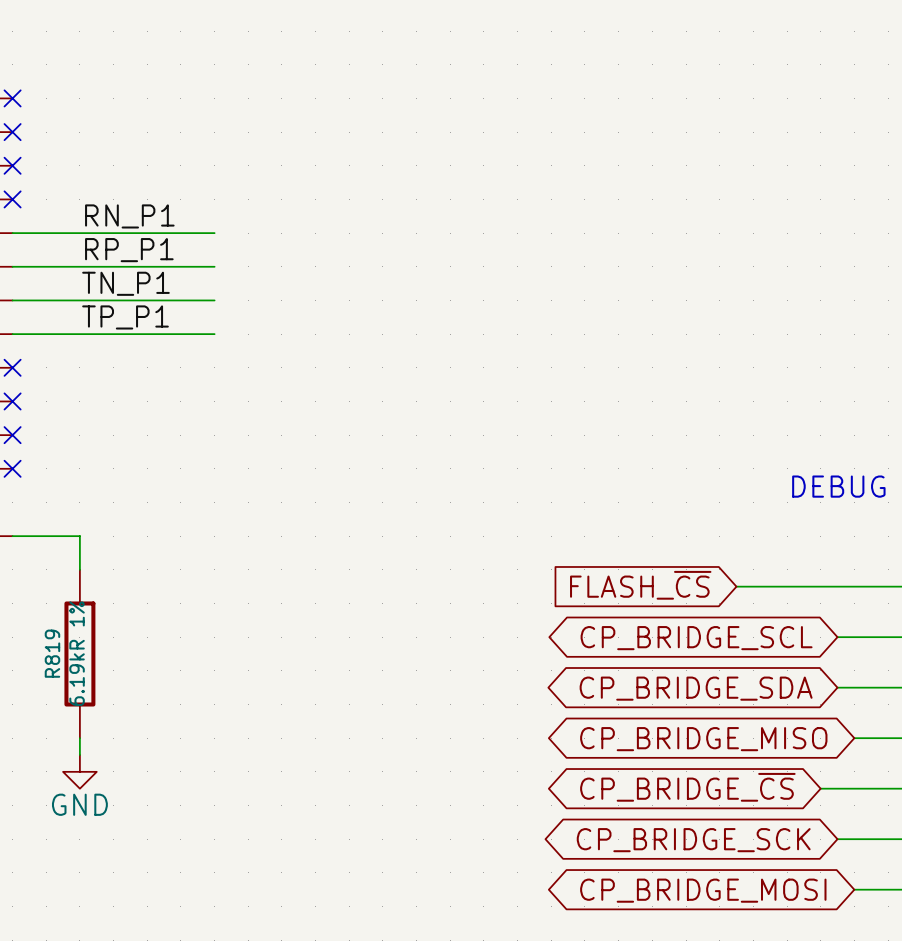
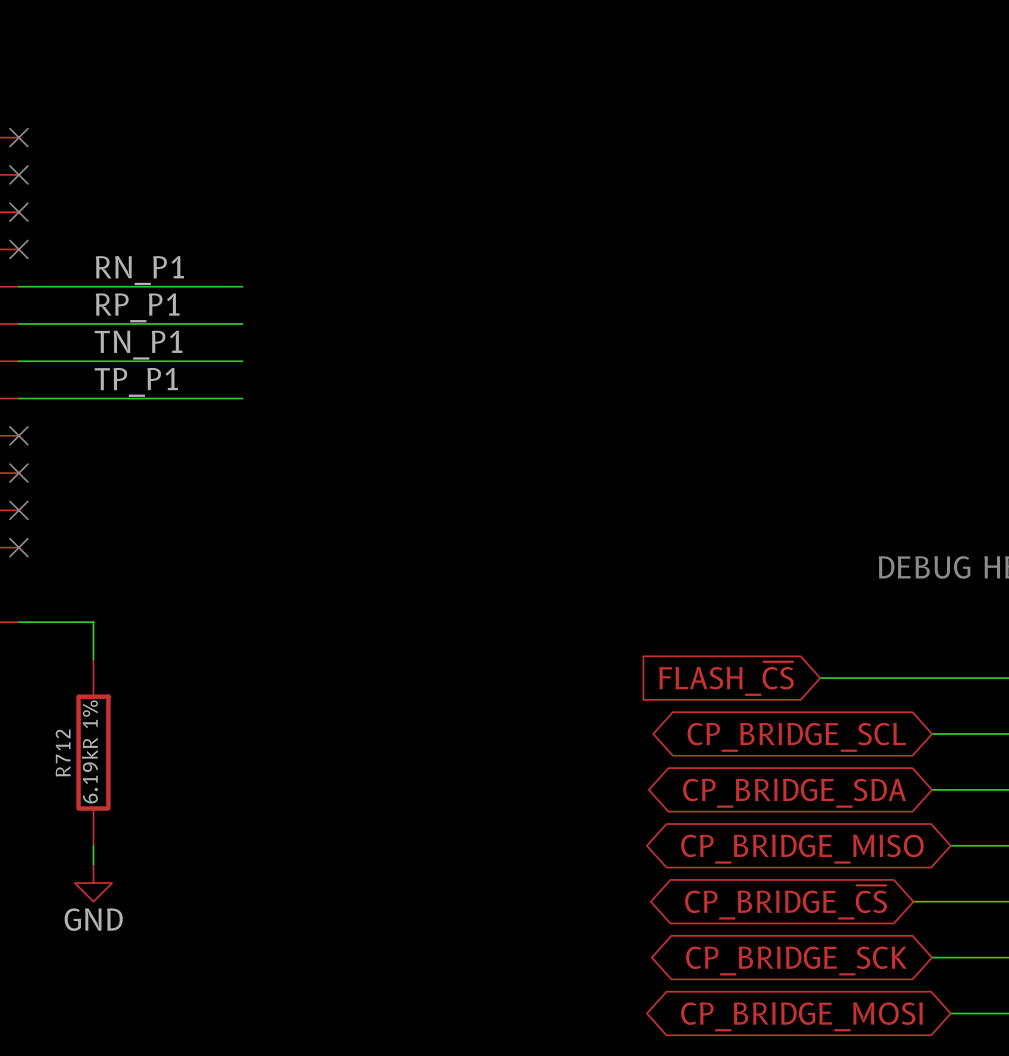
R819 name: R819 (52, 653) -> R712 (63, 753)

